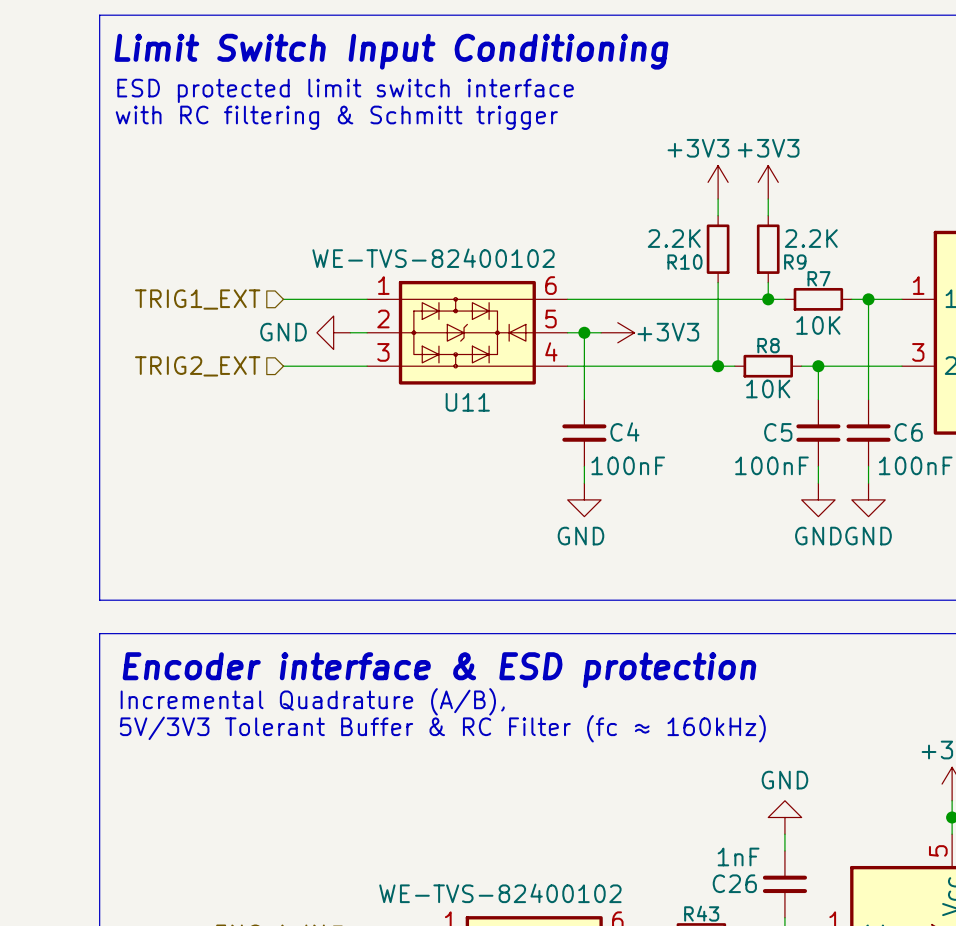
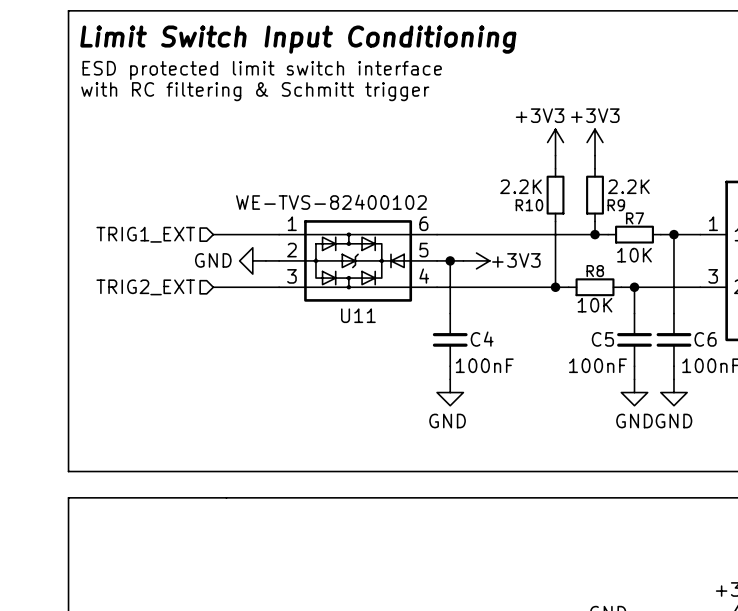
text: Encoder interface & ESD protection (439, 670) -> none
text: Incremental Quadrature (A/B), (312, 701) -> none
text: 5V/3V3 Tolerant Buffer & RC Filter (fc ≈ 160kHz) (442, 728) -> none

